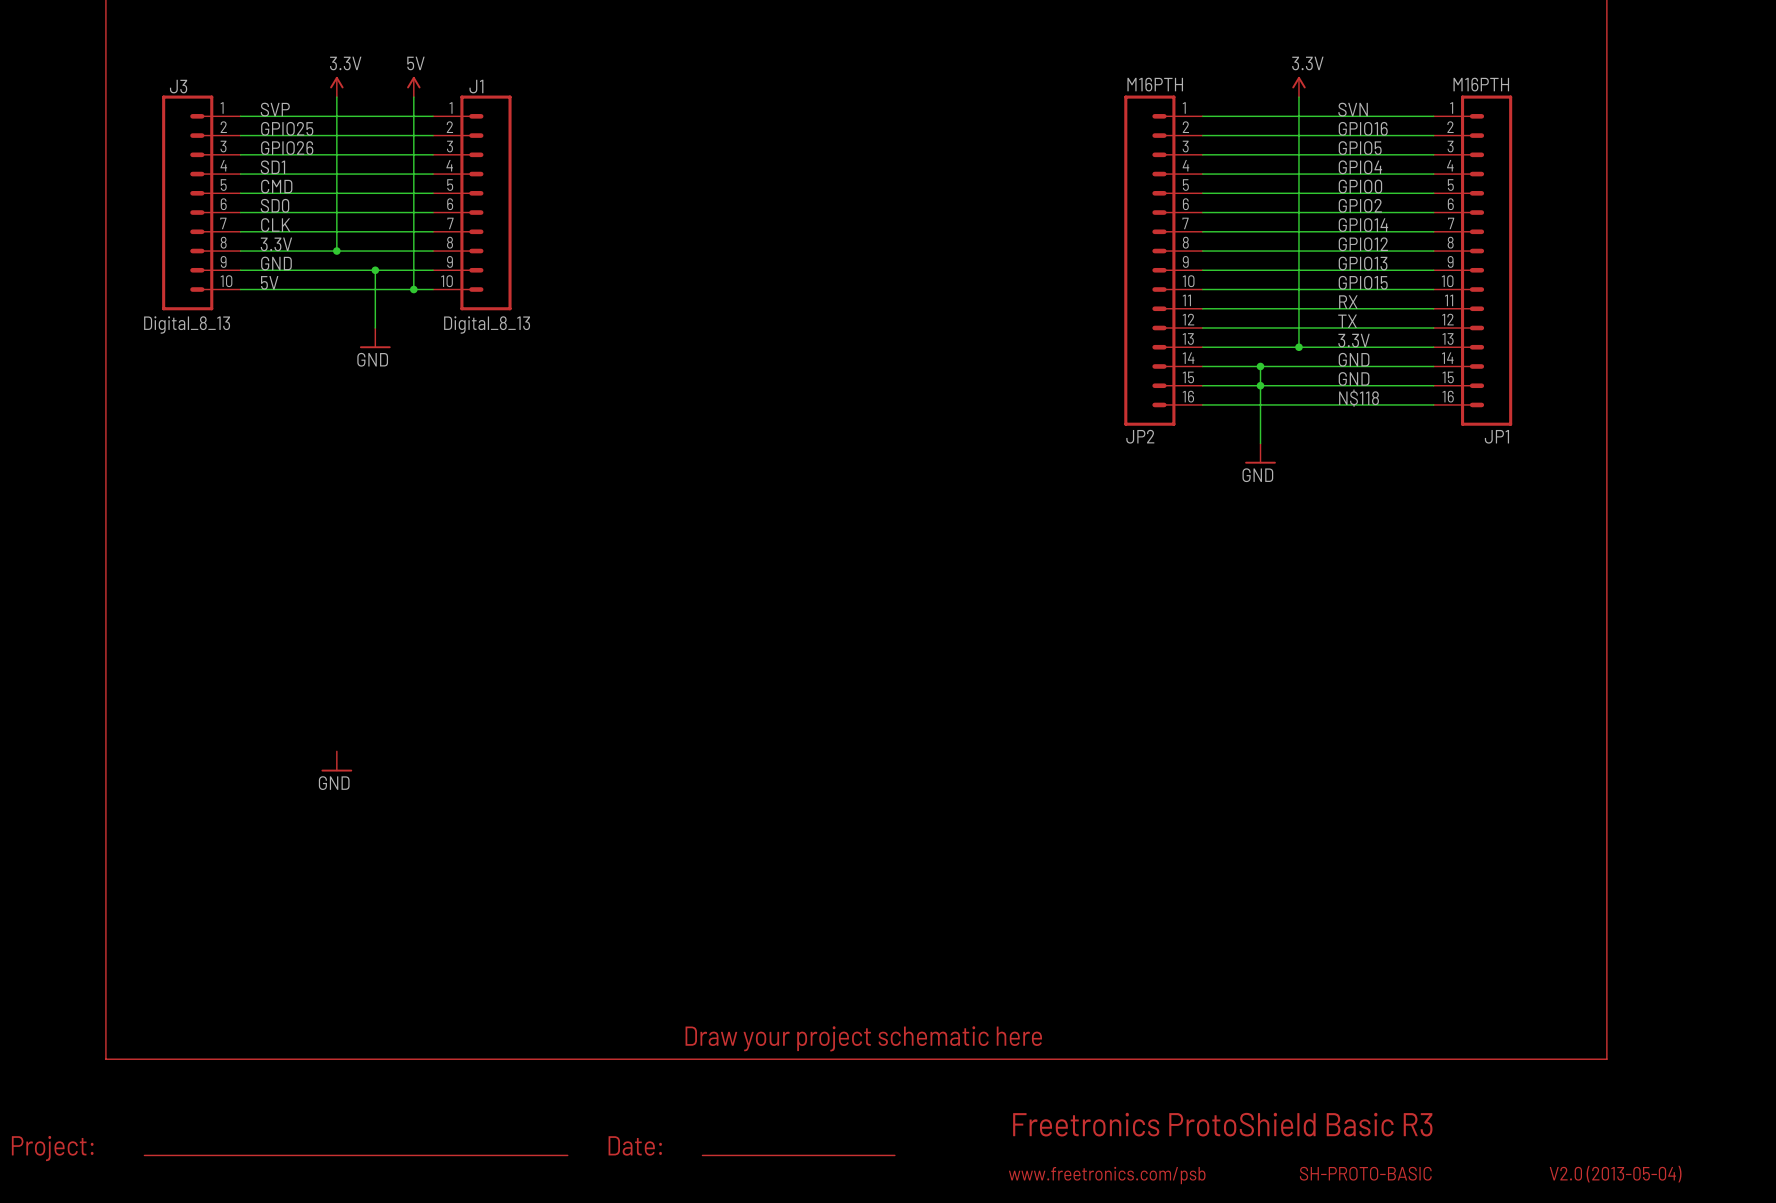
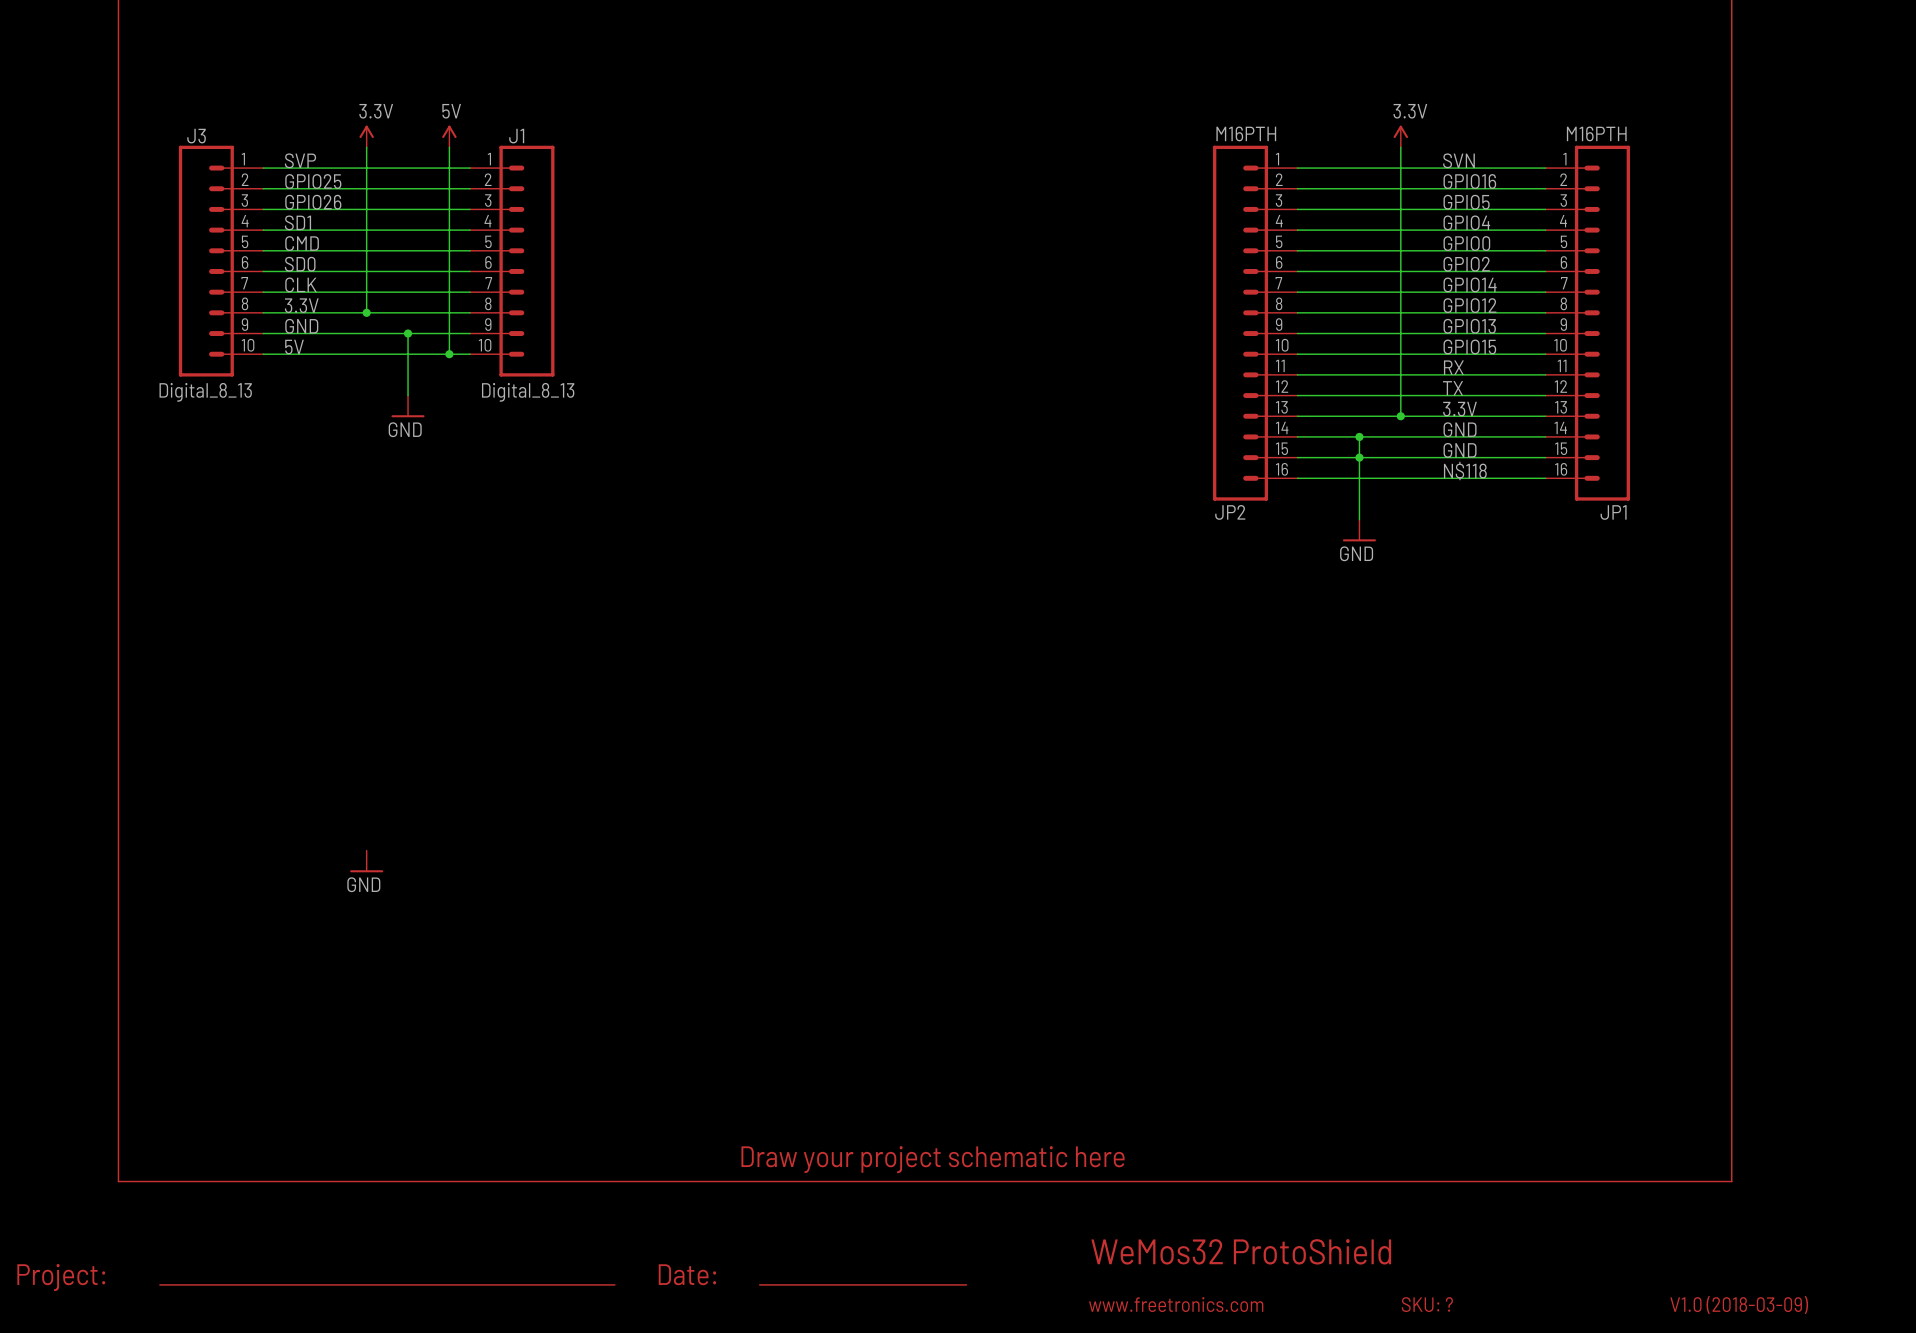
text: Freetronics ProtoShield Basic R3 (1222, 1124) -> WeMos32 ProtoShield (1241, 1251)
text: SH-PROTO-BASIC (1365, 1173) -> SKU: ? (1427, 1304)
text: V2.0 (2013-05-04) (1615, 1174) -> V1.0 (2018-03-09) (1739, 1305)
text: www.freetronics.com/psb (1107, 1175) -> www.freetronics.com (1176, 1304)

